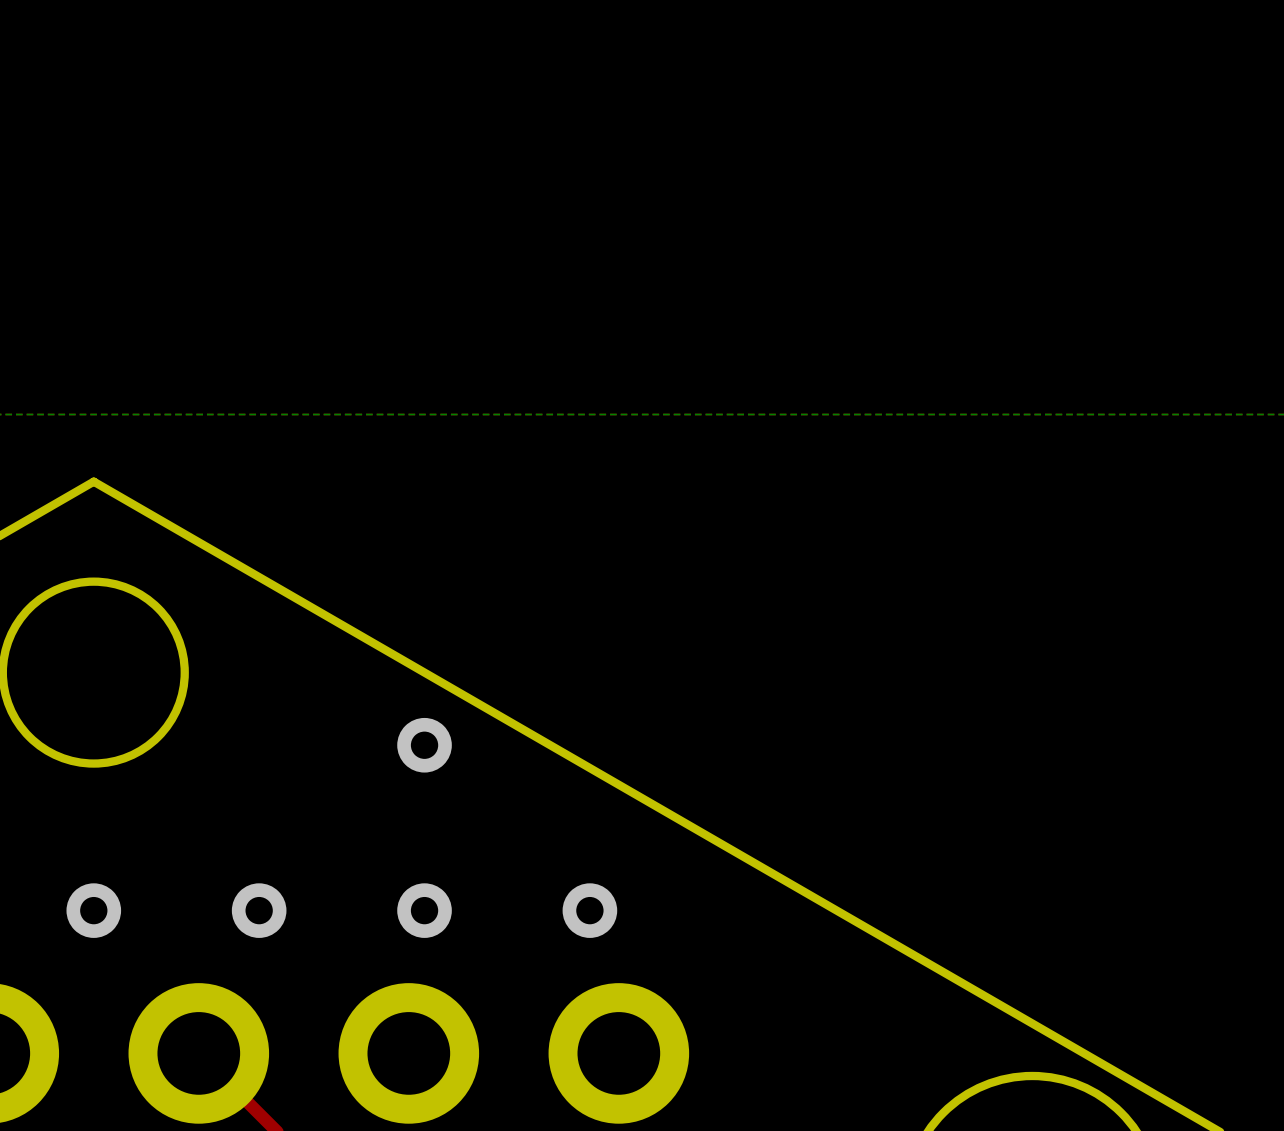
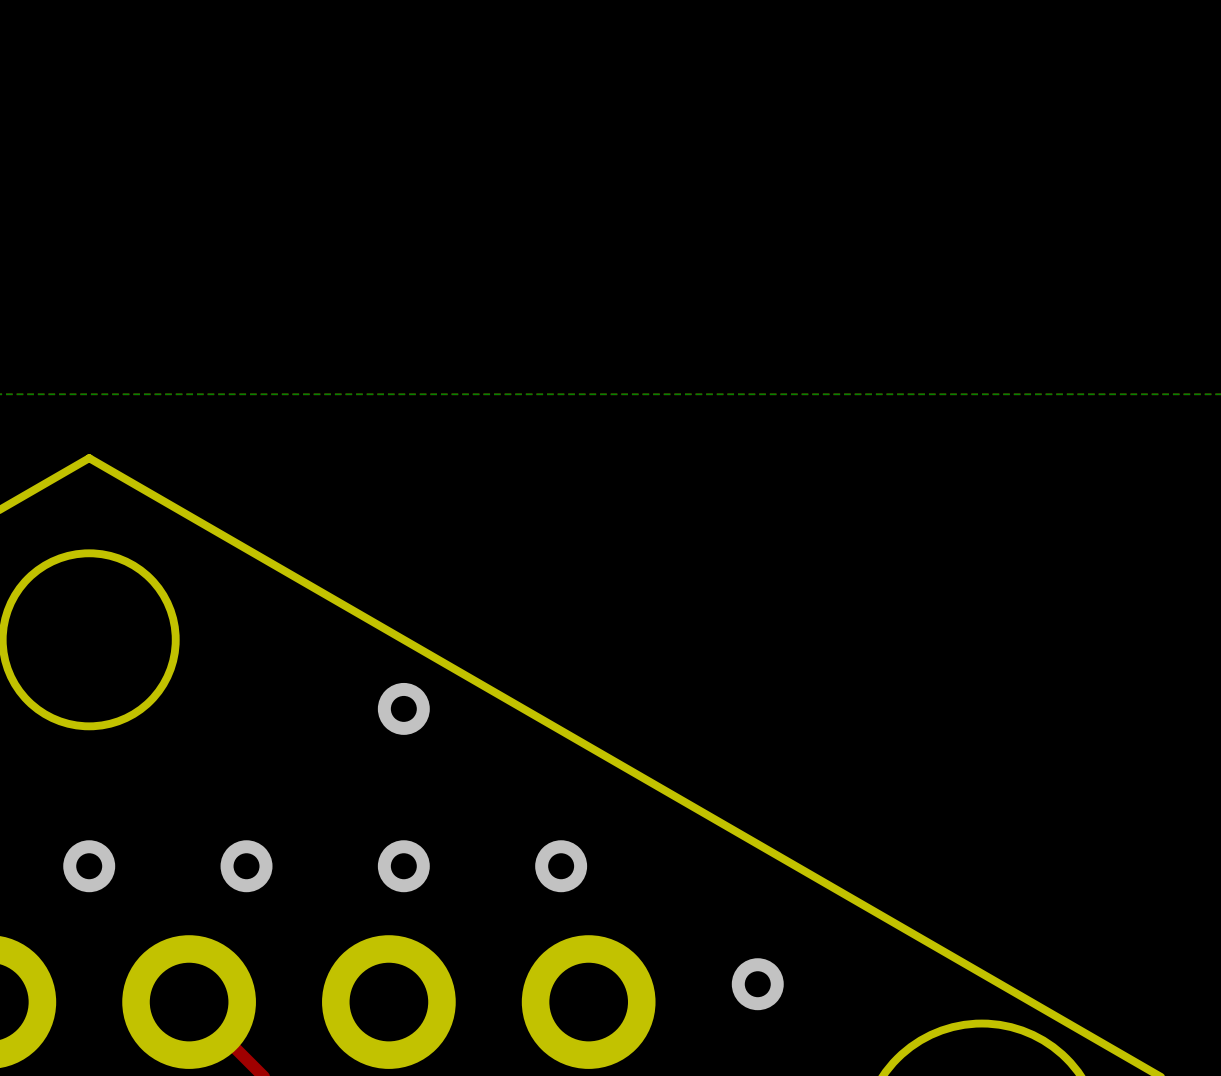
via: none -> (757, 984)

